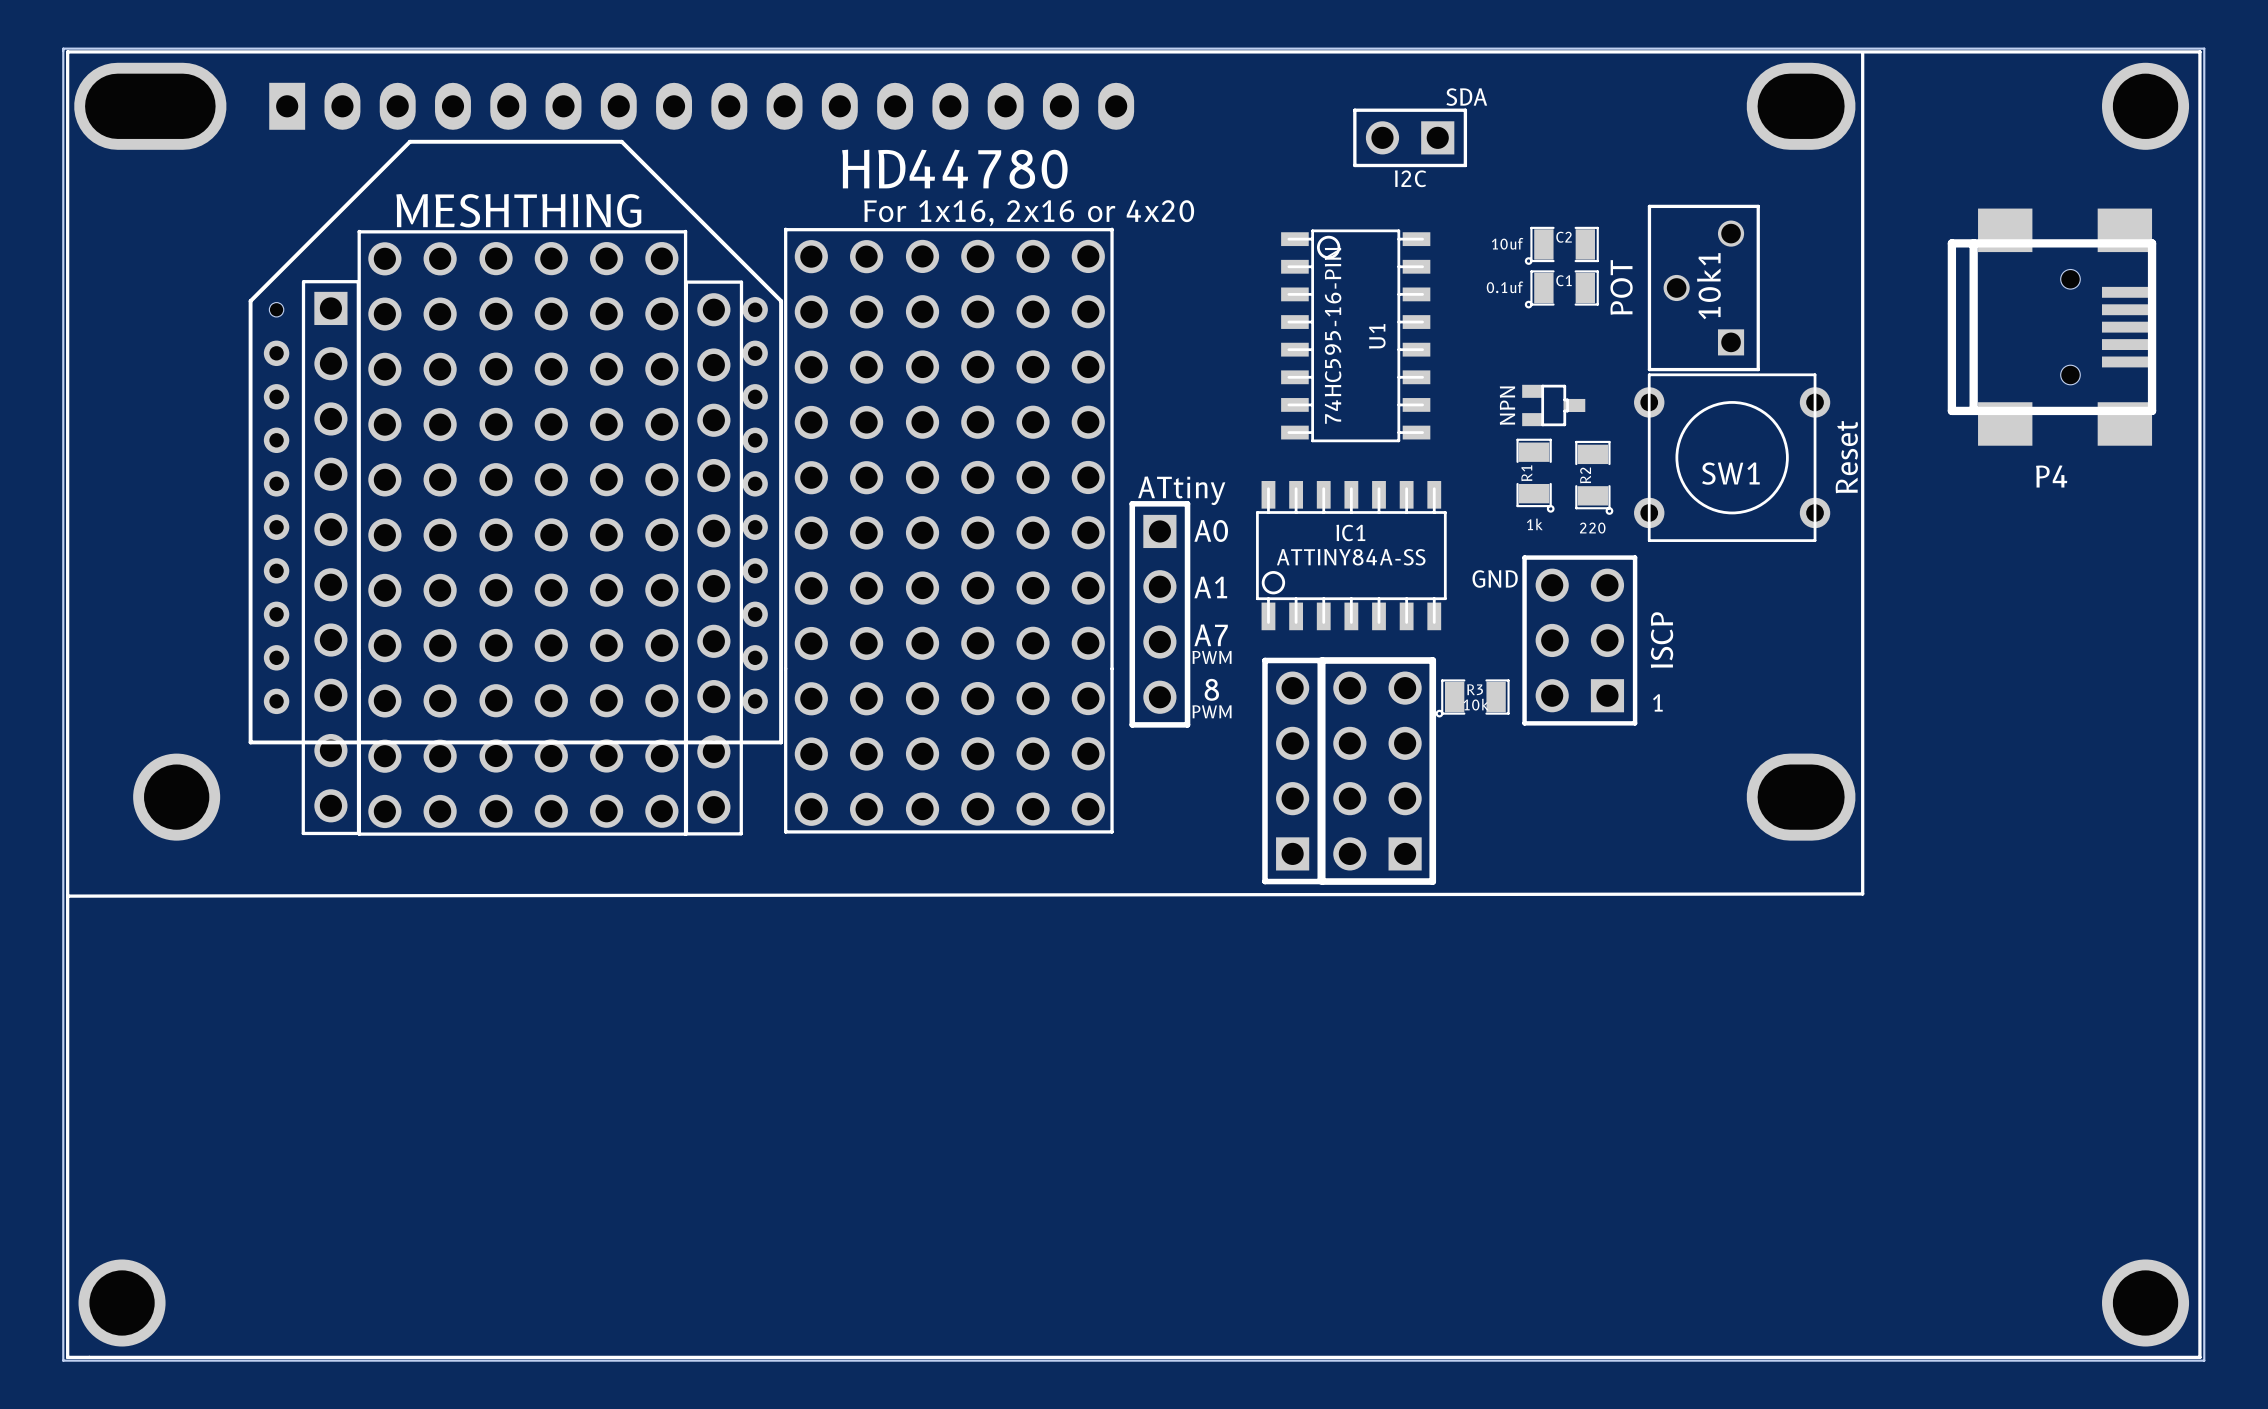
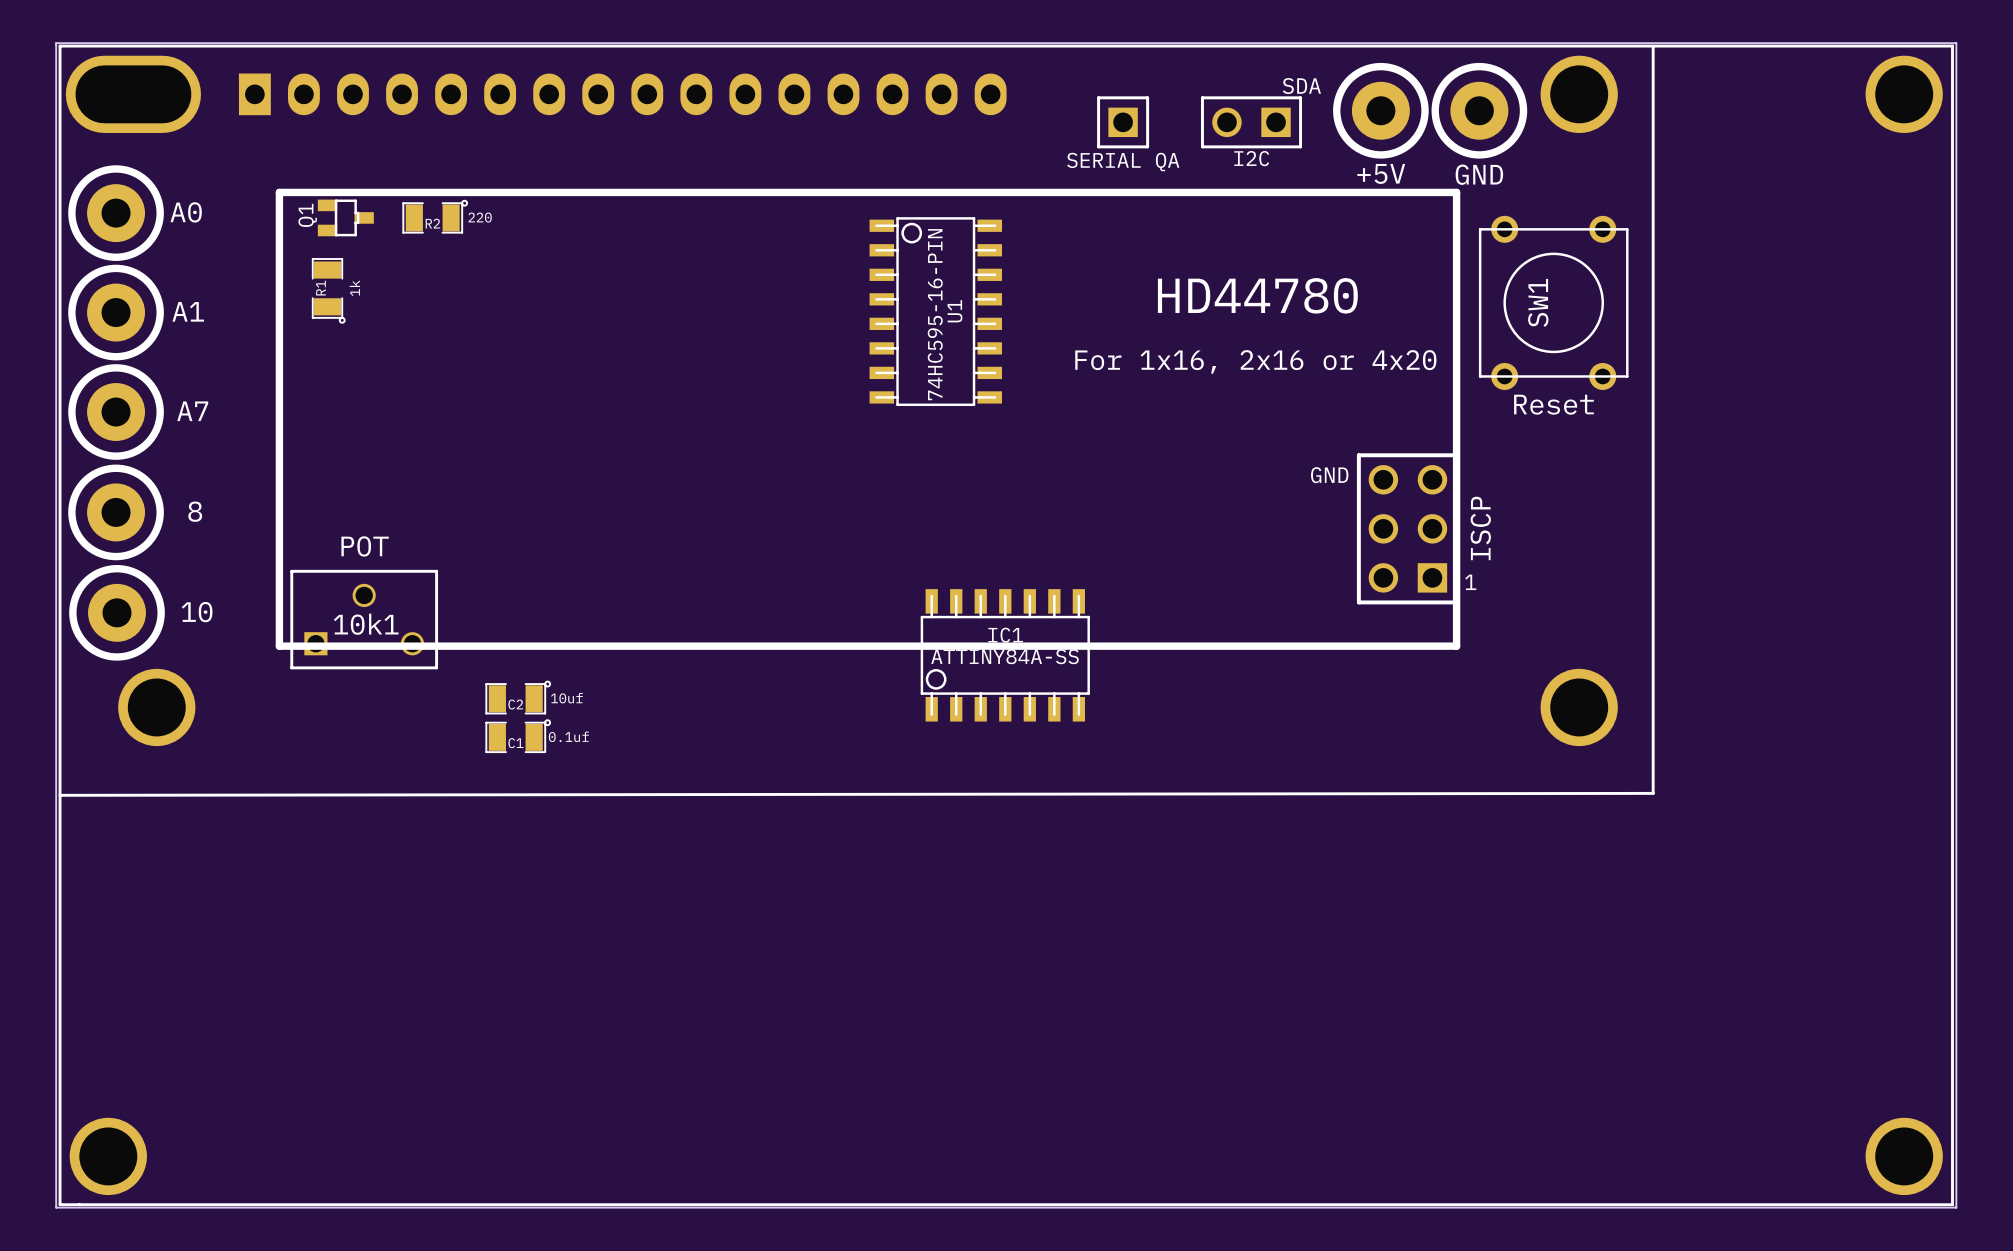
part footprint: [66, 50, 2202, 1360] -> [58, 44, 1954, 1207]
part: none -> +5V (1380, 110)
part: none -> GND (1479, 110)
part: none -> SERIAL QA (1123, 122)
part value position: HD44780 (954, 169) -> HD44780 (1257, 295)
part: none -> A0 (116, 213)
Q1: none -> (345, 217)
C2 rotation: 0° (1561, 245) -> 180° (518, 697)
C2 position: (1561, 245) -> (518, 697)
10k1 rotation: 0° (1703, 287) -> 90° clockwise (364, 619)
10k1 position: (1703, 287) -> (364, 619)
C1 rotation: 0° (1561, 289) -> 180° (518, 736)
C1 position: (1561, 289) -> (518, 736)
P4: (2051, 327) -> none
U1 value position: 74HC595-16-PIN (1333, 335) -> 74HC595-16-PIN (935, 314)
U1 position: (1355, 335) -> (935, 311)
part: none -> A1 (116, 312)
part: NPN (1553, 405) -> none
part: MESHTHING (515, 442) -> none
SW1 rotation: 0° (1732, 457) -> 90° clockwise (1553, 302)
SW1 position: (1732, 457) -> (1553, 302)
part: none -> A7 (116, 412)
R1 position: (1535, 475) -> (328, 290)
R2 rotation: 0° (1594, 477) -> 90° counterclockwise (435, 216)
R2 position: (1594, 477) -> (435, 216)
R1 value rotation: 0° (1534, 524) -> 90° counterclockwise (354, 288)
R1 value position: 1k (1534, 524) -> 1k (354, 288)
part: (948, 530) -> none
part: (522, 532) -> none
IC1 position: (1351, 555) -> (1005, 655)
part: (330, 557) -> none
part: (713, 558) -> none
part: none -> 8 (116, 512)
text position: GND (1495, 578) -> GND (1329, 475)
part: (1159, 614) -> none
part position: (1579, 640) -> (1407, 528)
part: none -> 10 (117, 612)
R3: 10k (1472, 698) -> none
text position: 1 (1657, 702) -> 1 (1470, 582)
part: (1292, 771) -> none
part: (1377, 771) -> none

